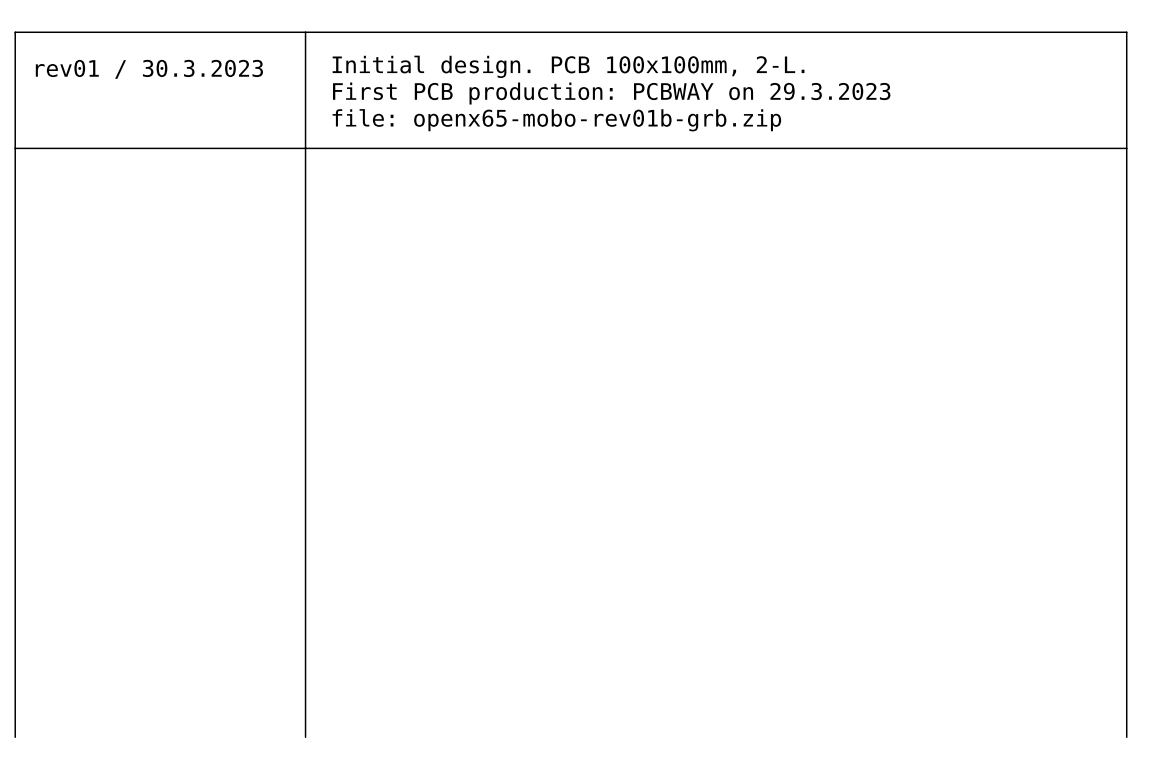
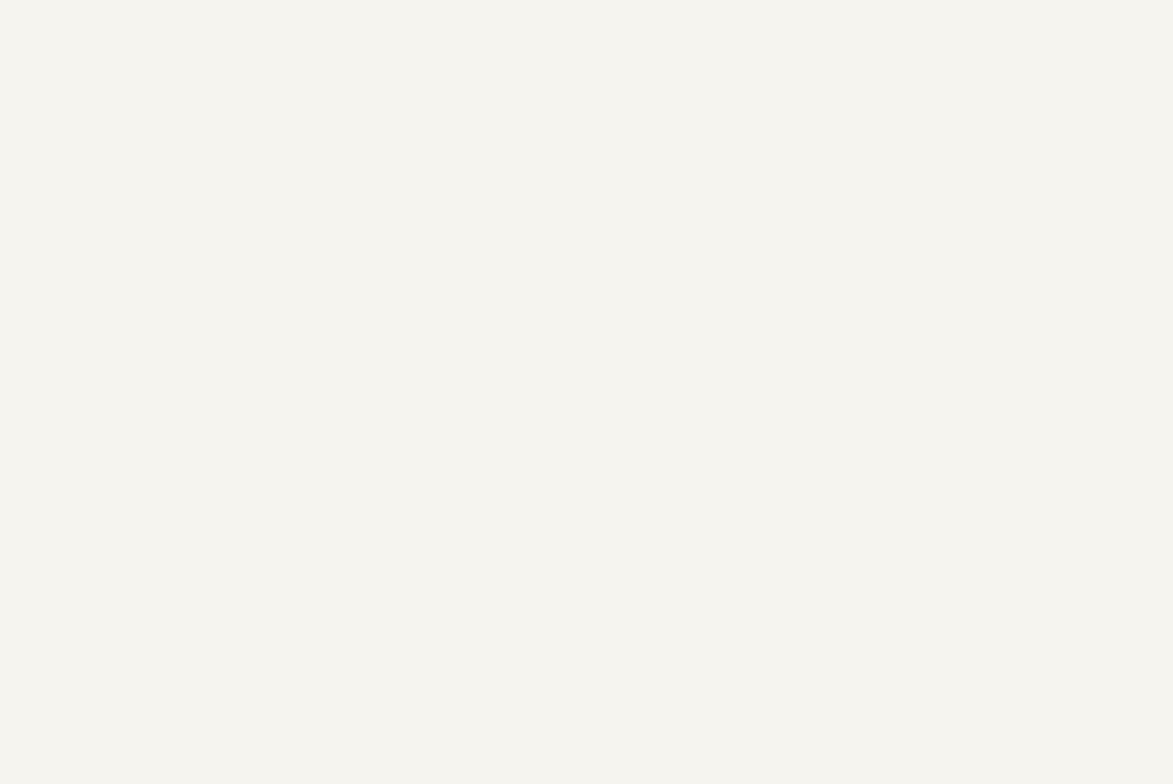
line: (305, 32) (305, 737) -> none
text: Initial design. PCB 100x100mm, 2-L. (568, 66) -> none
text: rev01 / 30.3.2023 (149, 69) -> none
text: First PCB production: PCBWAY on 29.3.2023 (611, 93) -> none
text: file: openx65-mobo-rev01b-grb.zip (556, 120) -> none
line: (15, 148) (1126, 148) -> none
line: (15, 737) (15, 32) (1126, 32) (1126, 737) -> none

